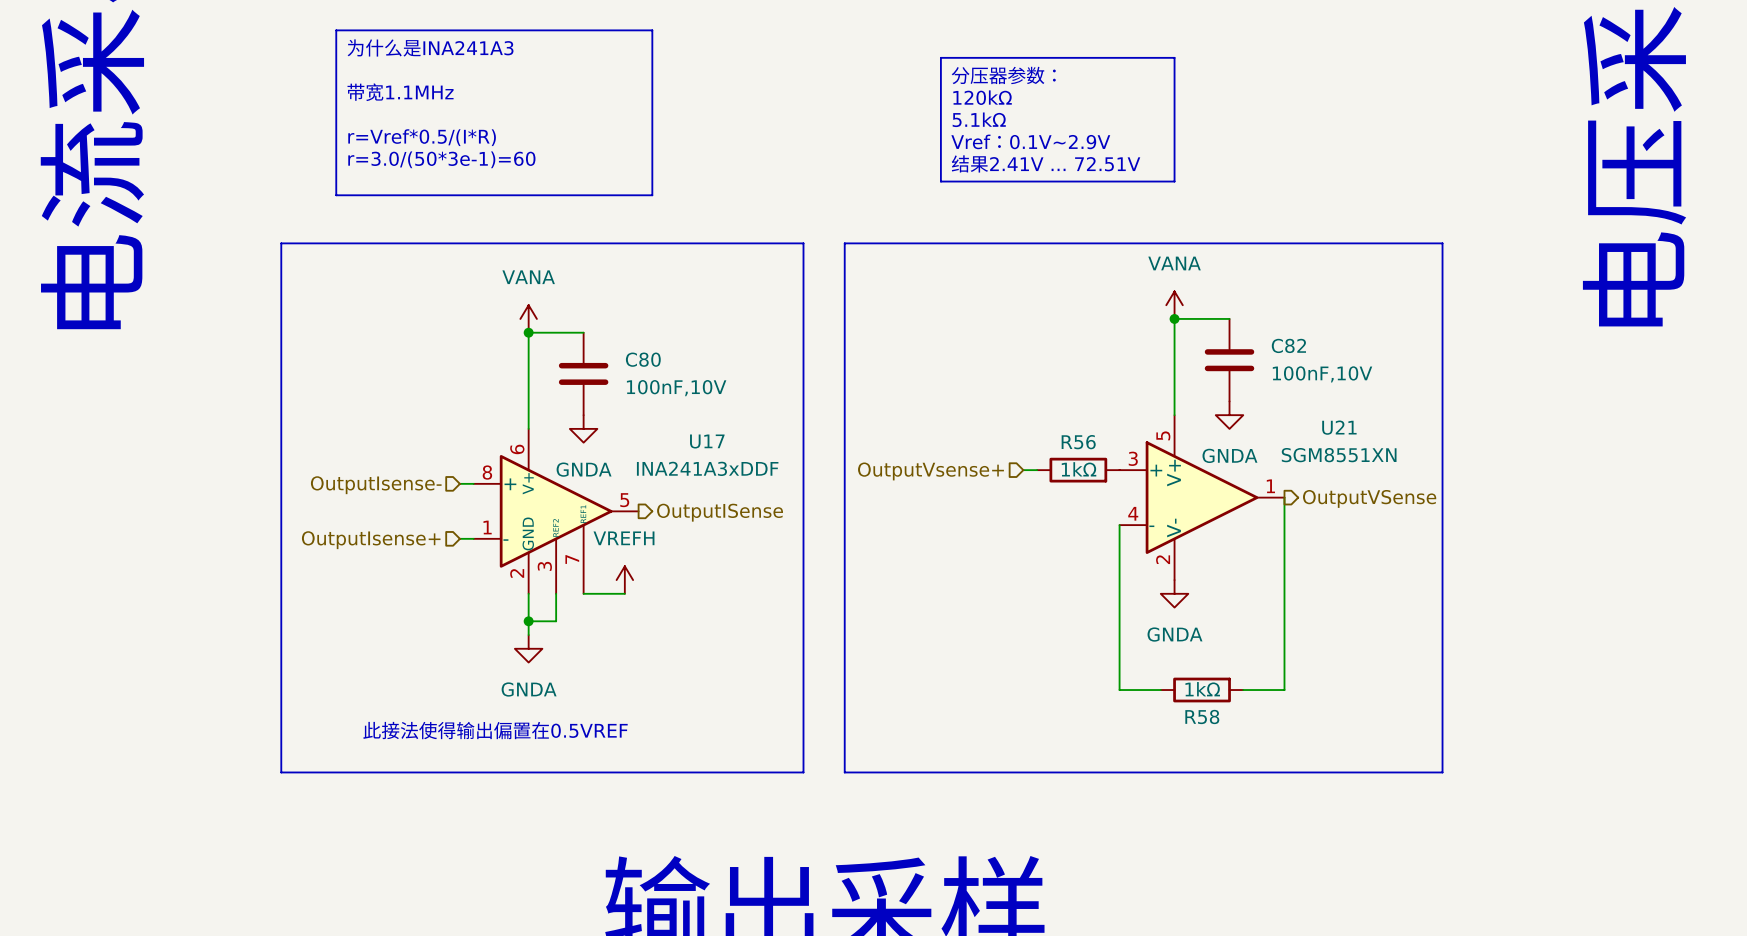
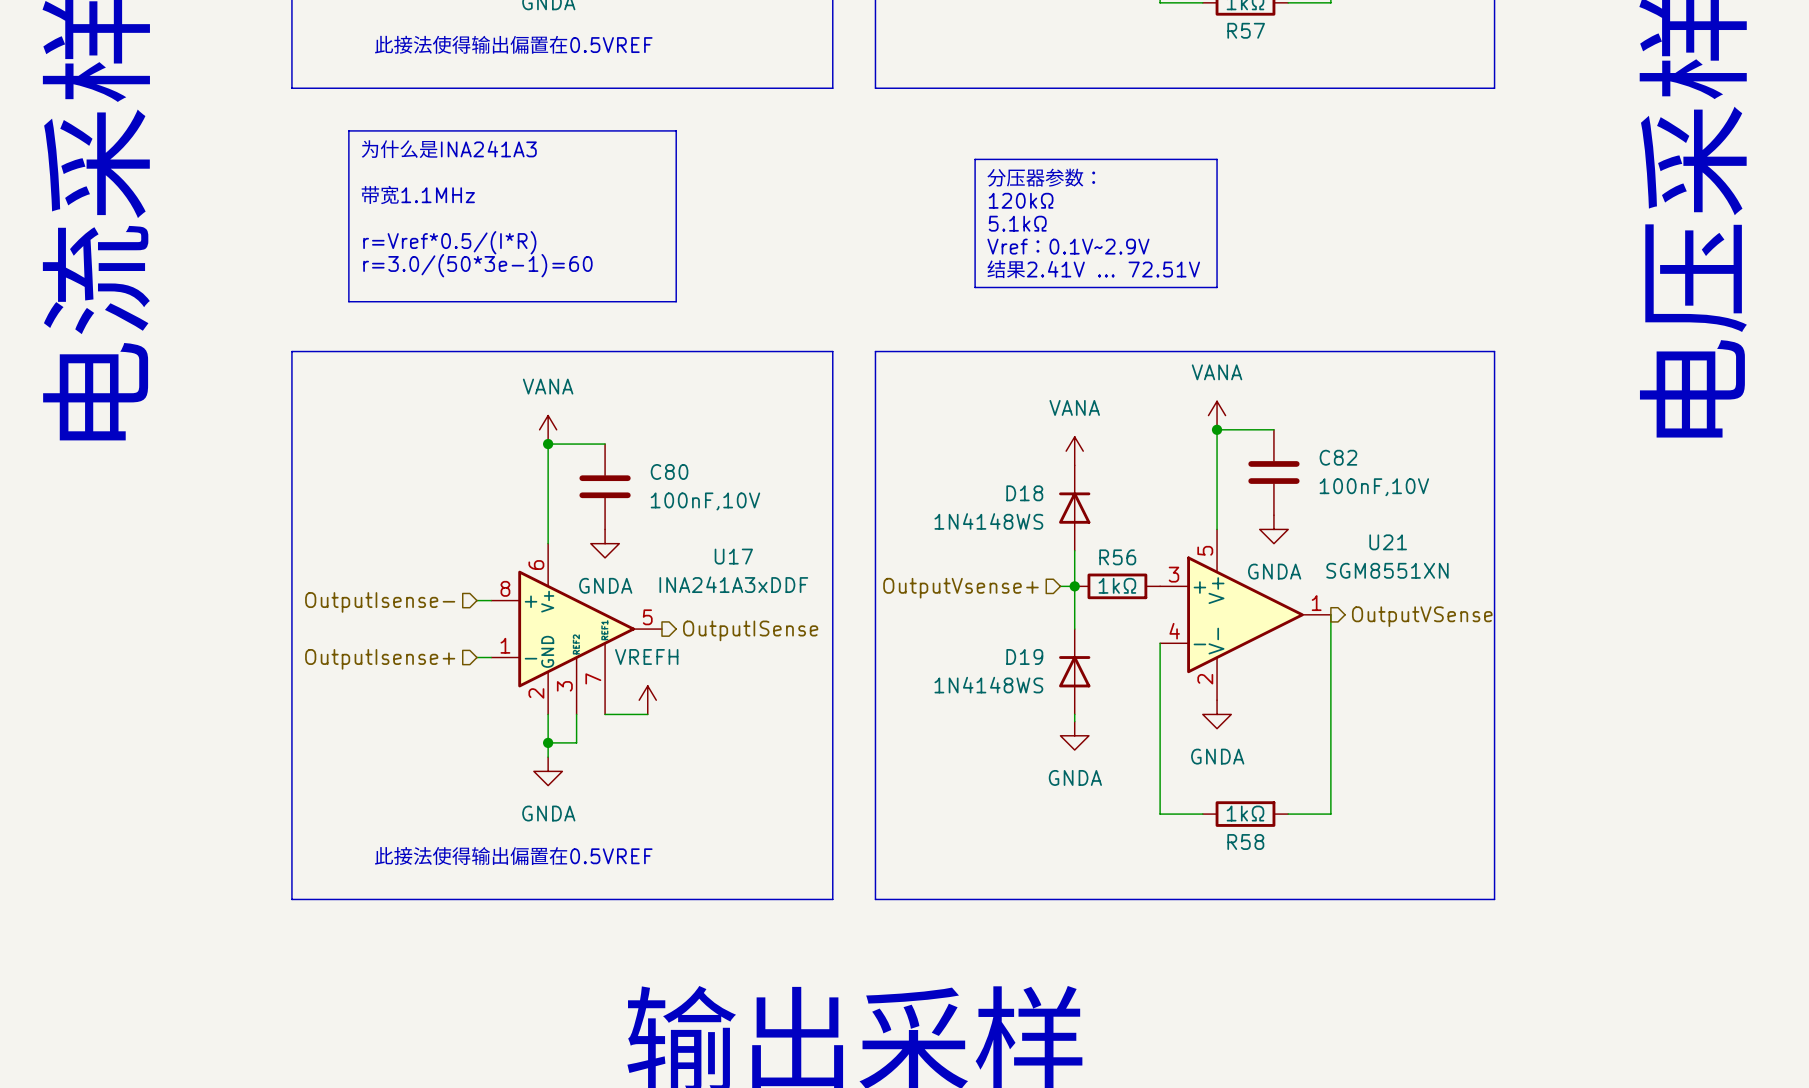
power symbol: none -> VANA (1074, 451)
D18: none -> 1N4148WS (1074, 508)
wire: none -> (1074, 550) (1074, 629)
junction: none -> (1074, 586)
D19: none -> 1N4148WS (1074, 671)
wire: none -> (1074, 714) (1074, 721)
power symbol: none -> GNDA (1074, 735)

